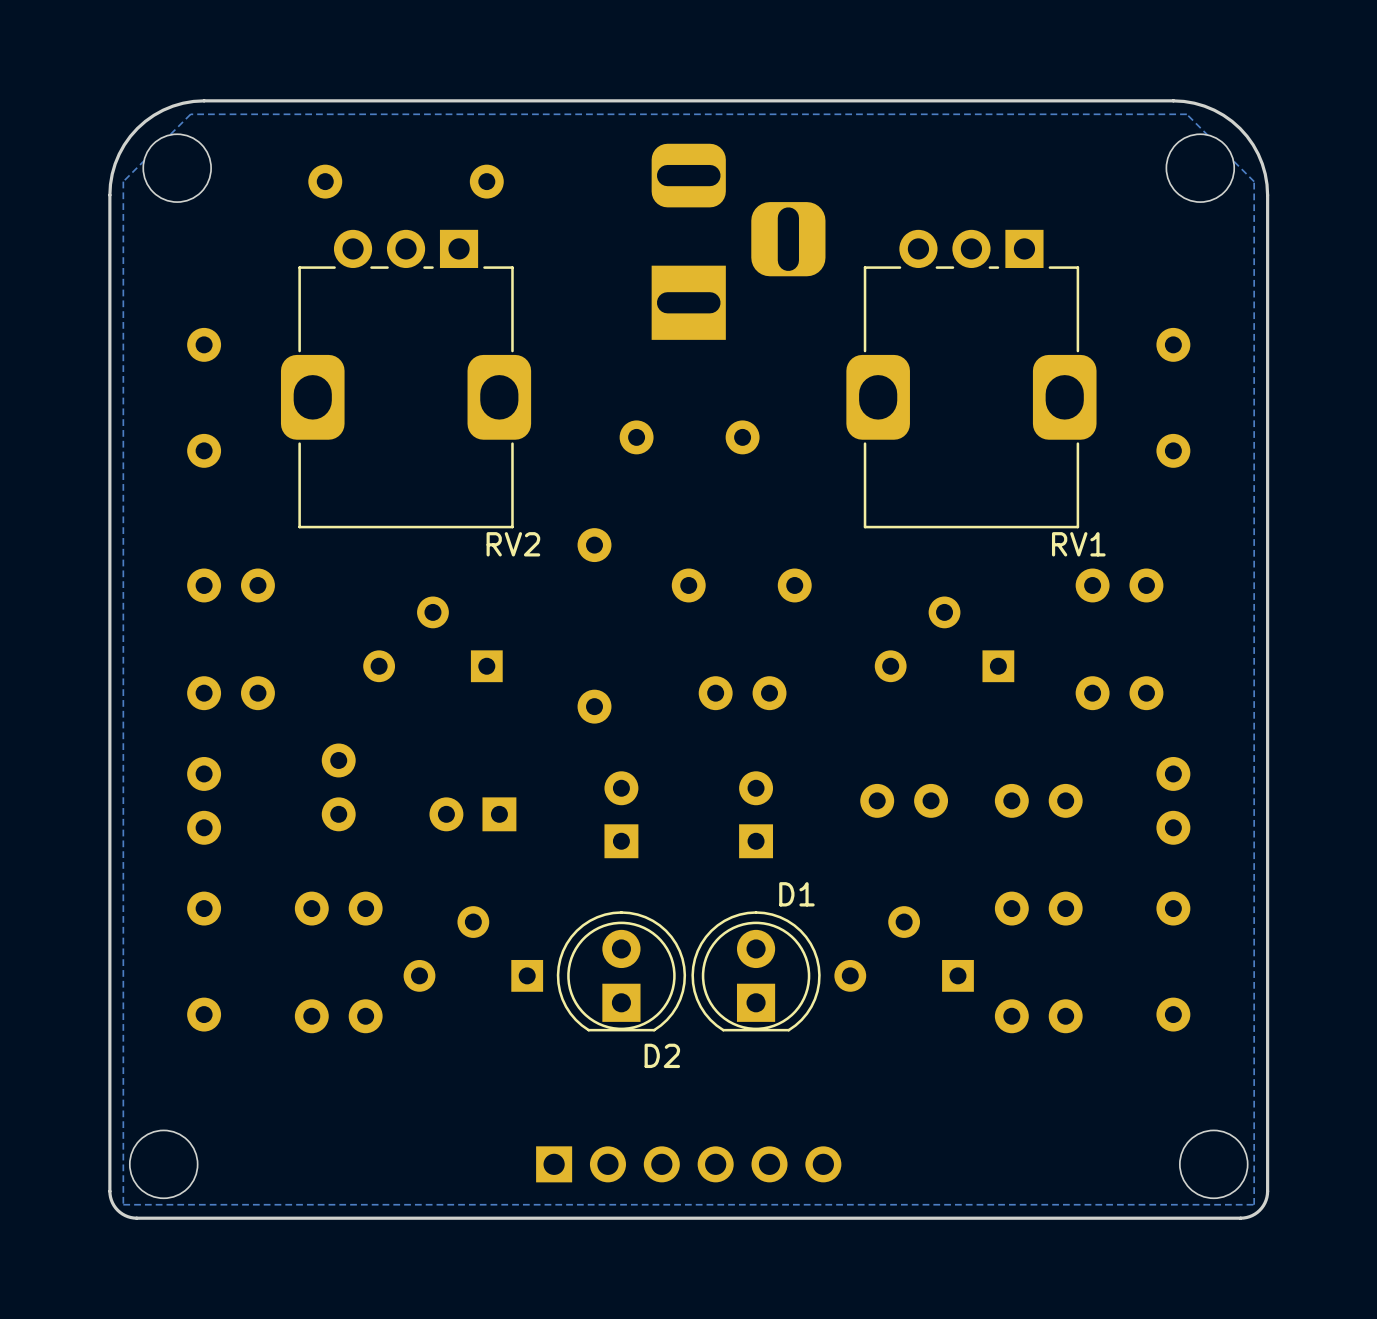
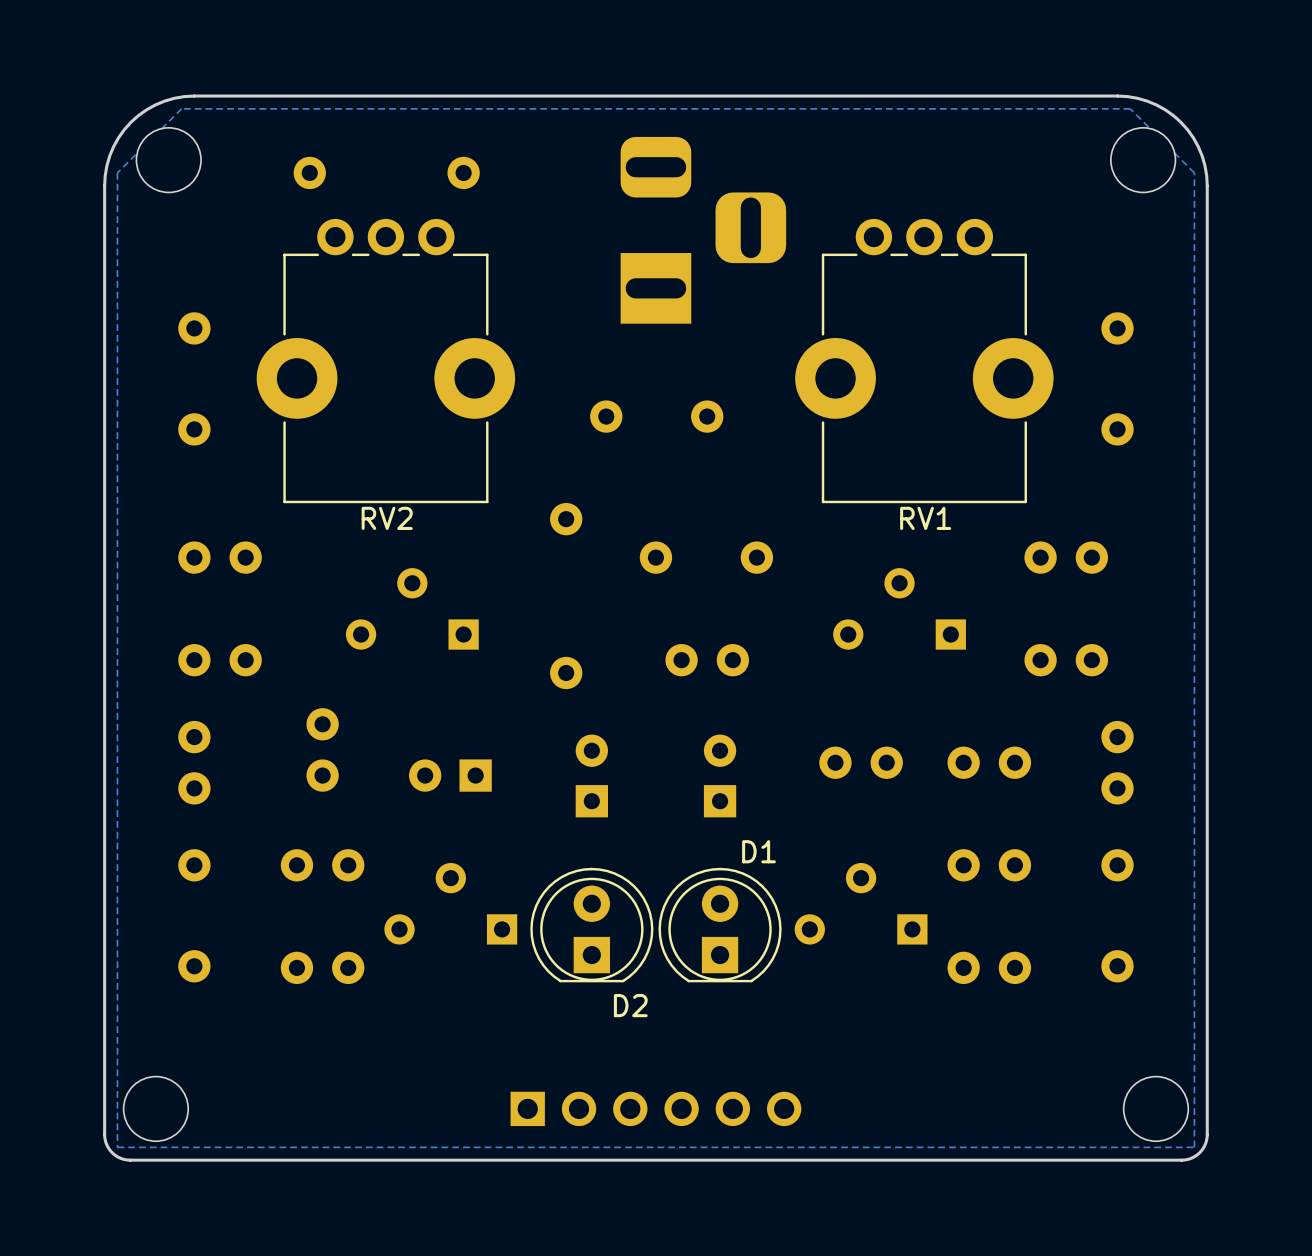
RV2 footprint: [280, 229, 532, 529] -> [256, 218, 516, 504]
RV1 footprint: [846, 229, 1097, 529] -> [795, 218, 1054, 504]
RV2 name position: RV2 (513, 544) -> RV2 (387, 518)
RV1 name position: RV1 (1078, 544) -> RV1 (925, 518)

